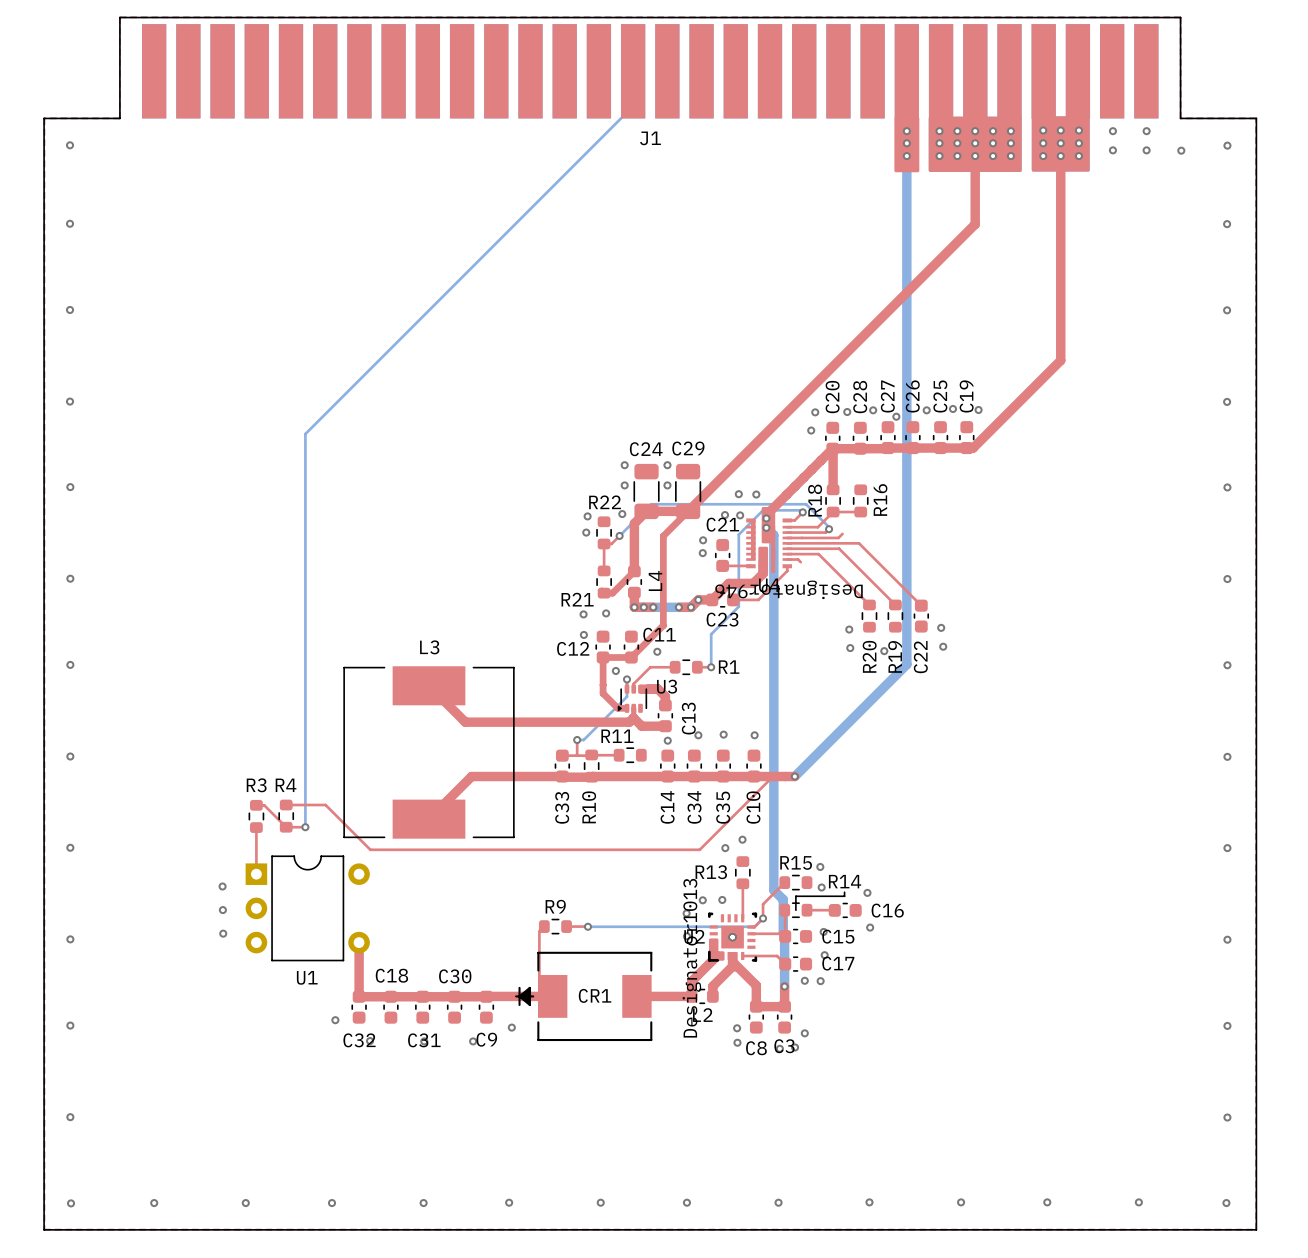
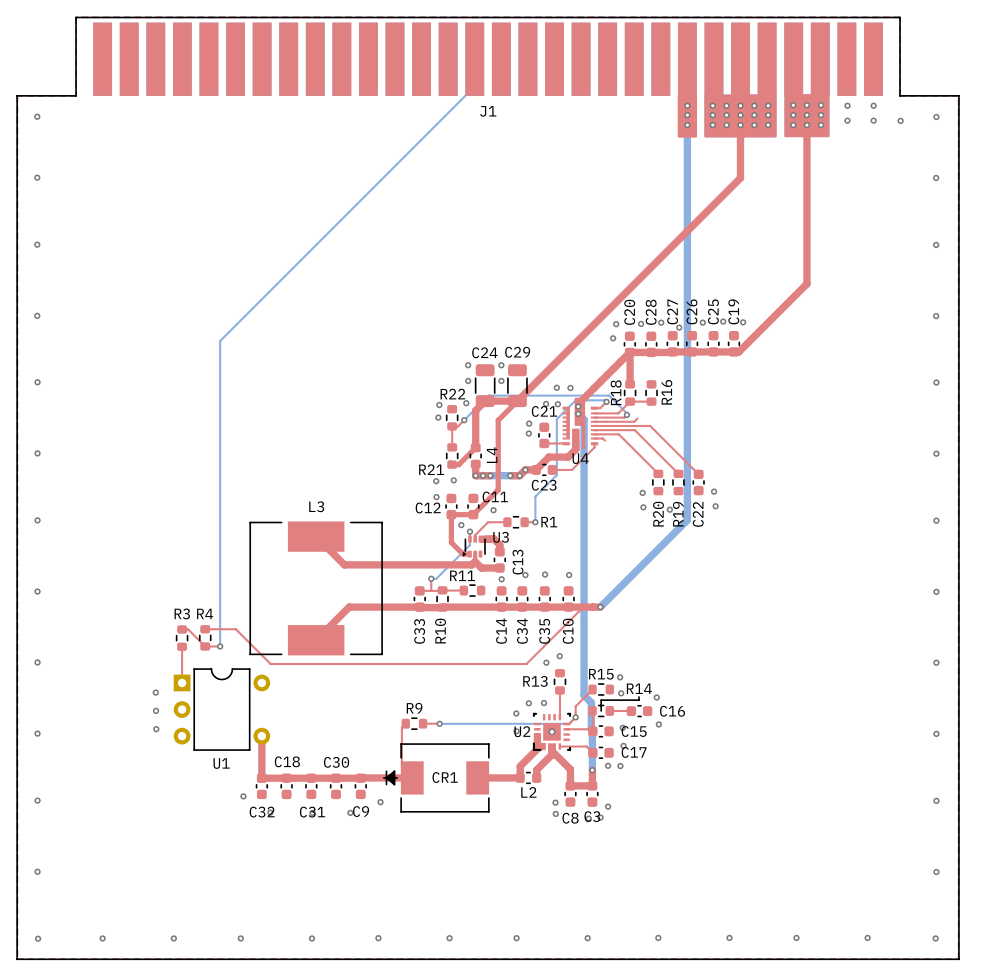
U4 text: Designator946 (789, 589) -> none
U2 text: Designator1013 (691, 958) -> none

